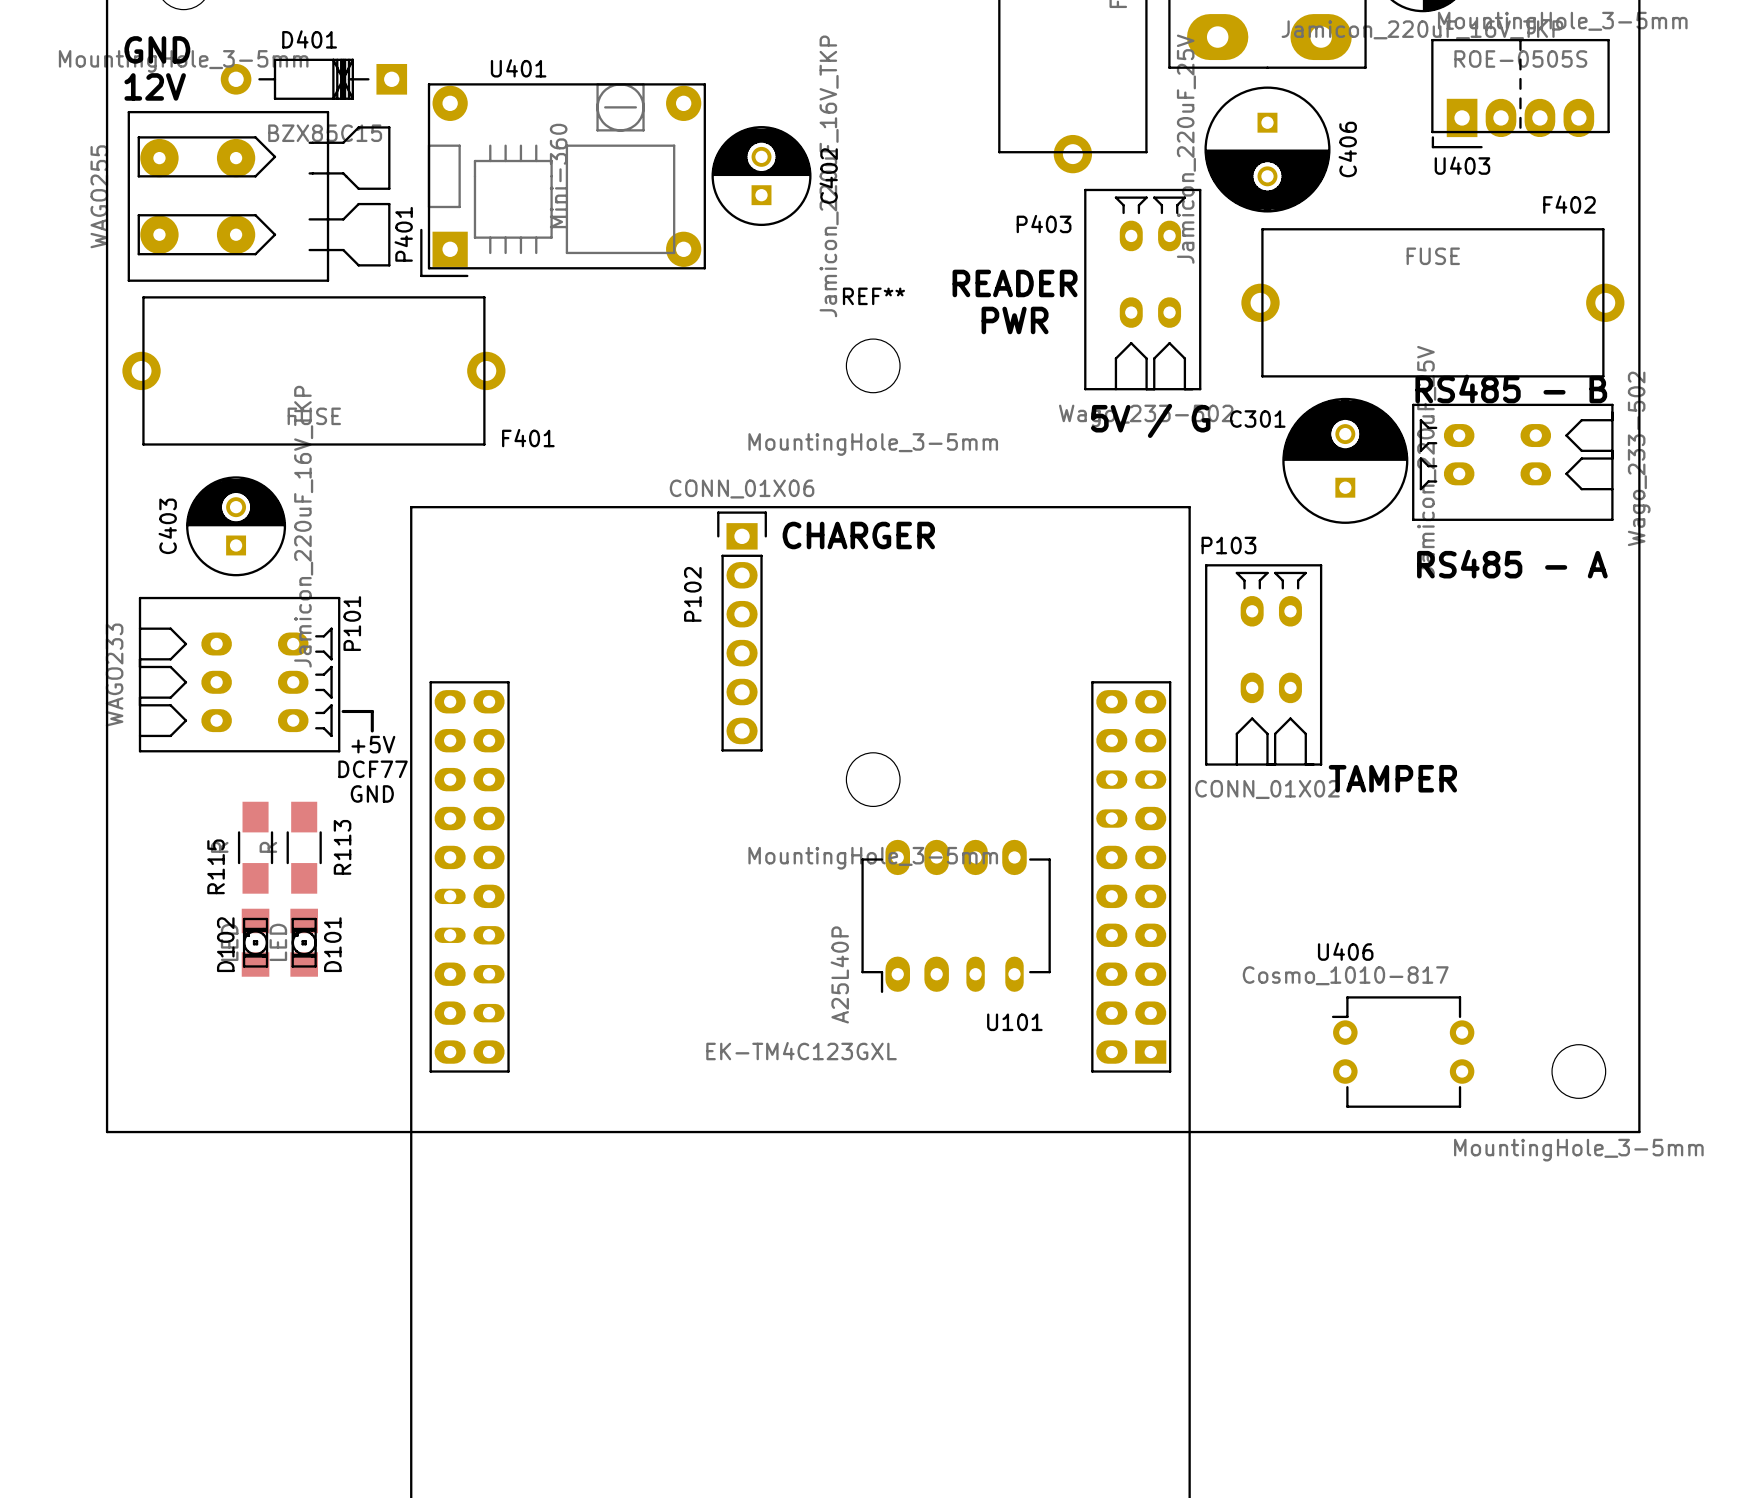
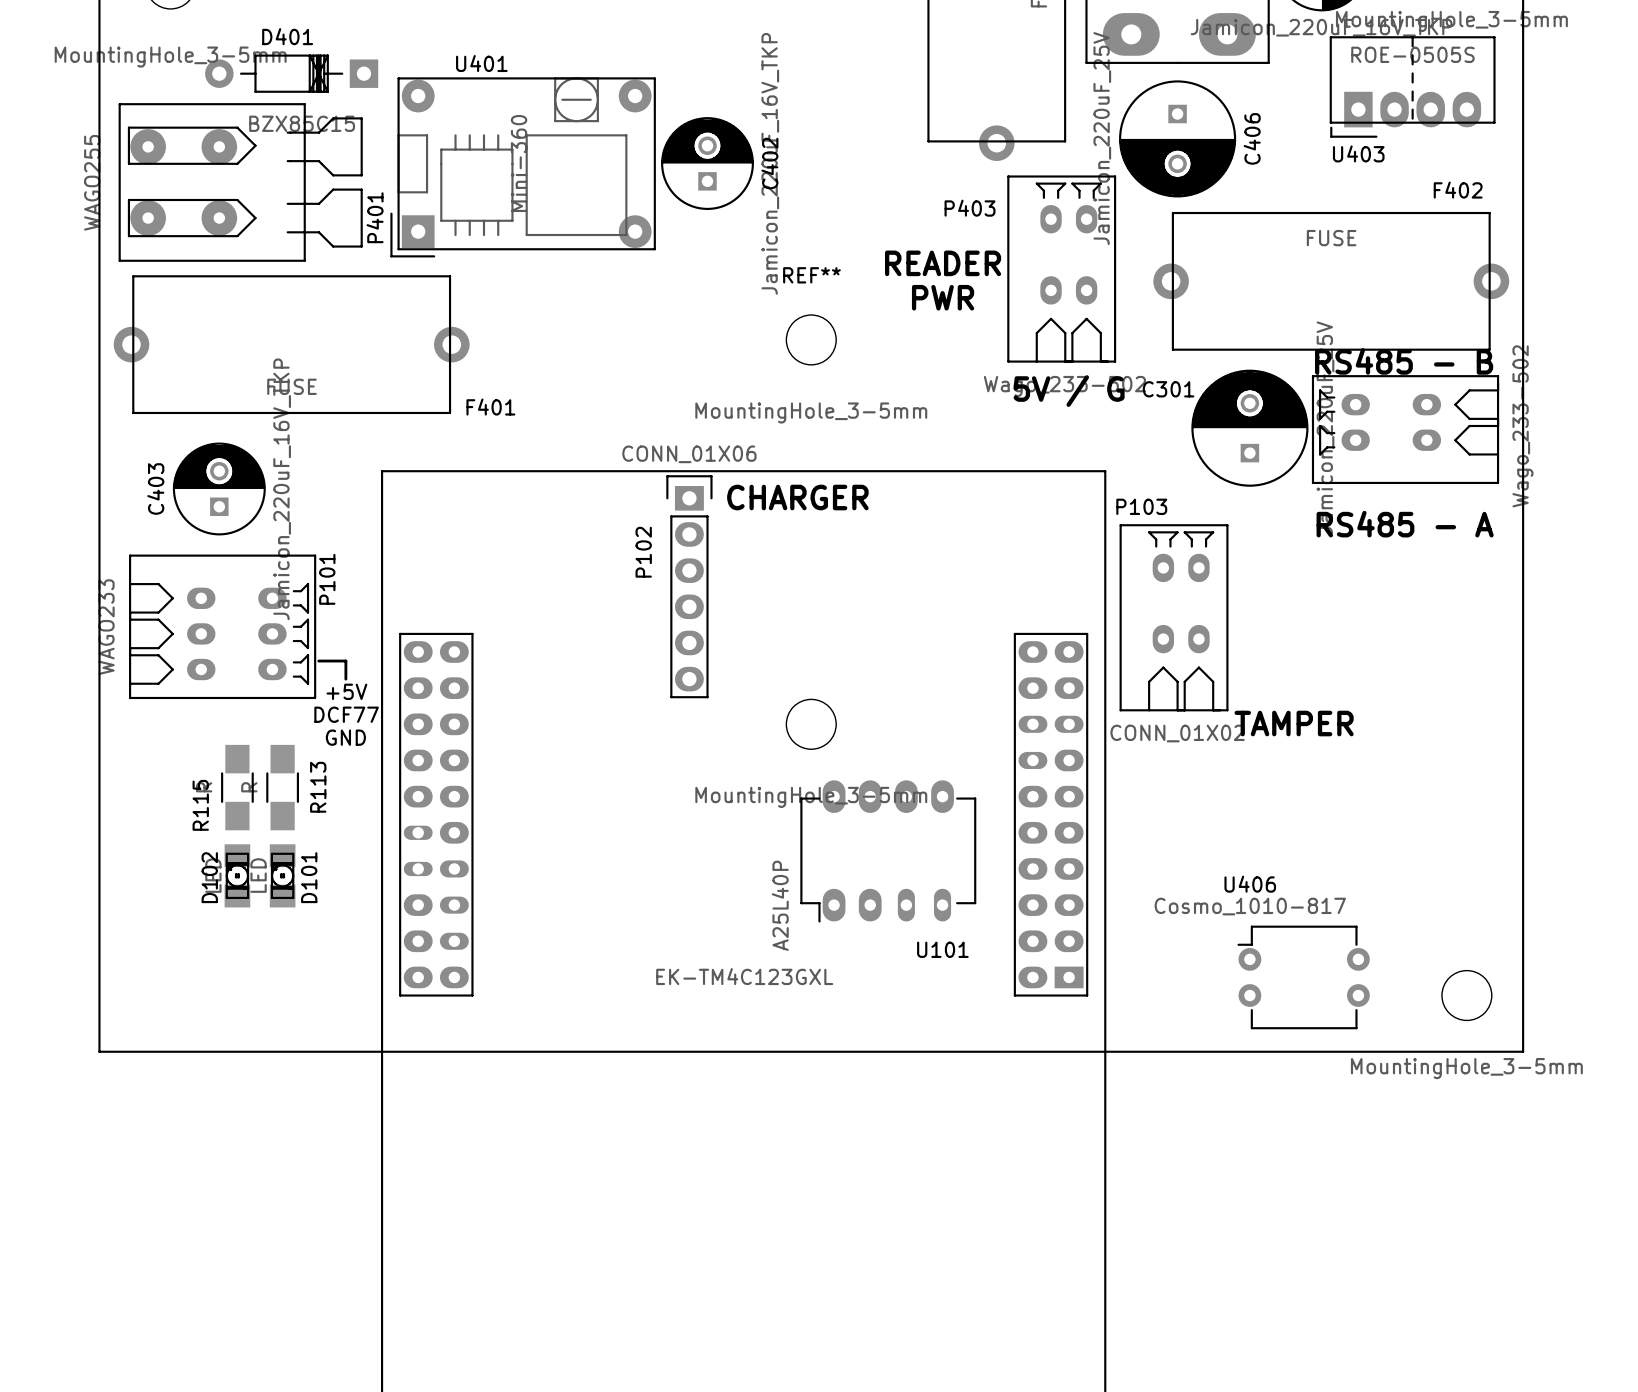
text: GND (157, 49) -> none
text: 12V (155, 86) -> none

